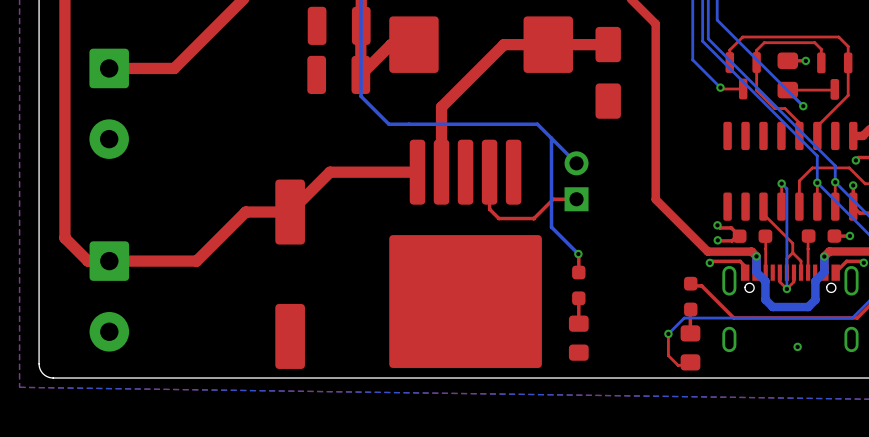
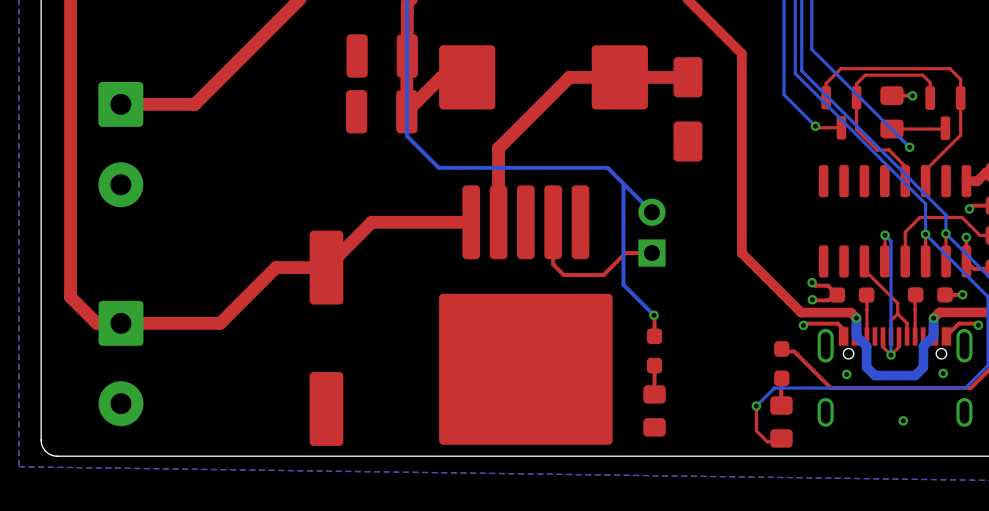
via: none -> (943, 373)
via: none -> (846, 374)

